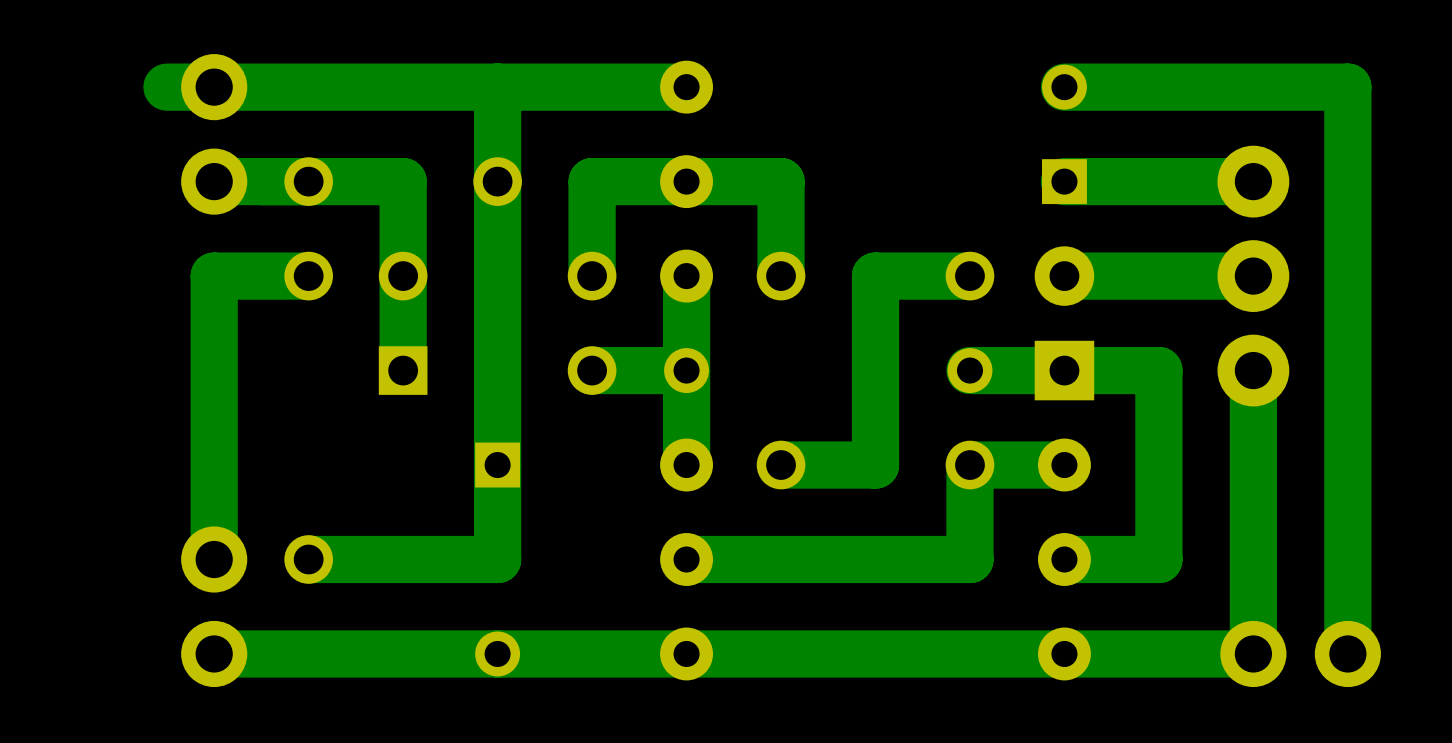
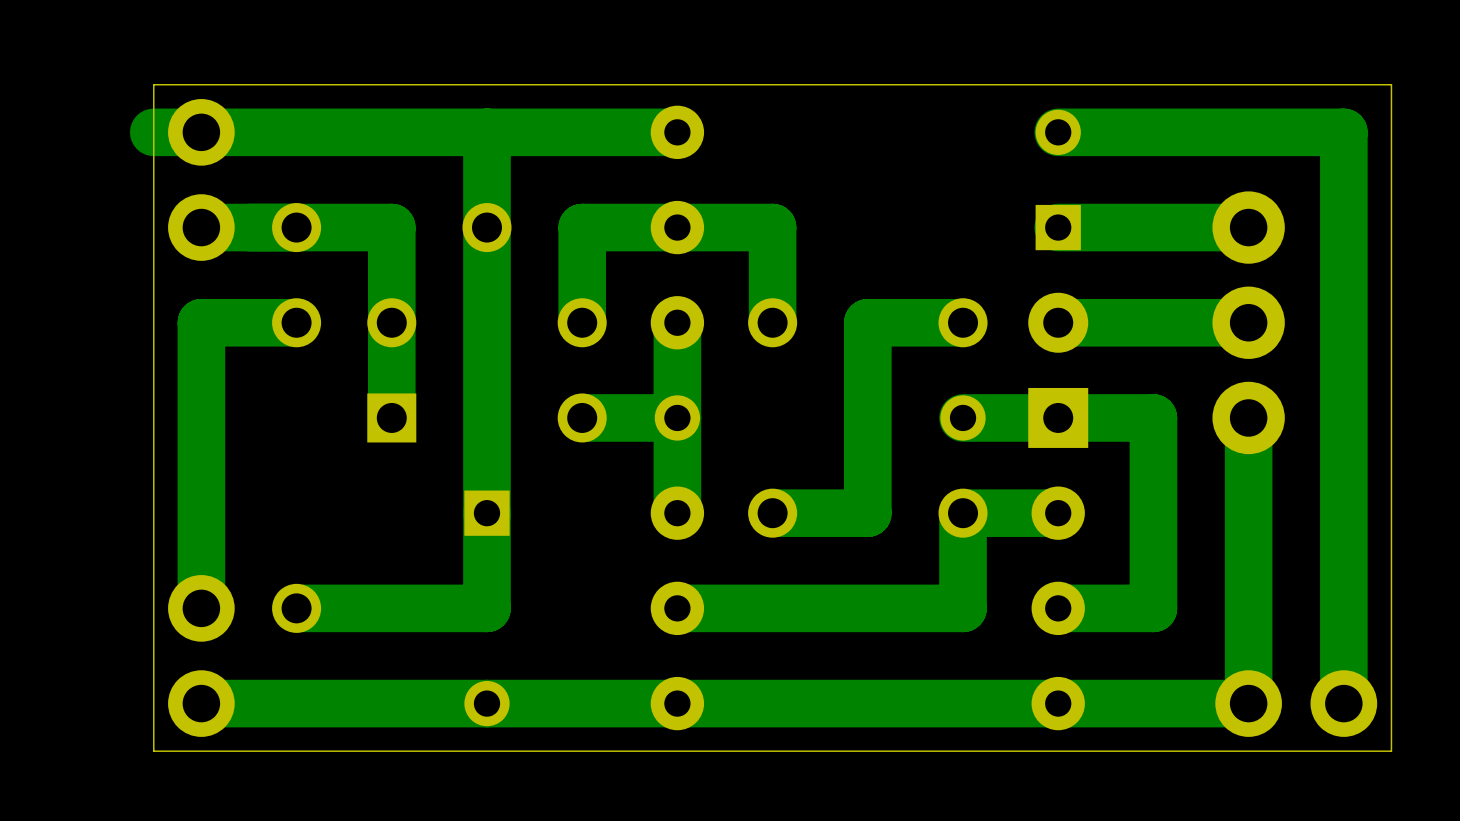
board edge: none -> (1391, 84) (153, 84) (153, 751) (1391, 751) (1391, 84)

